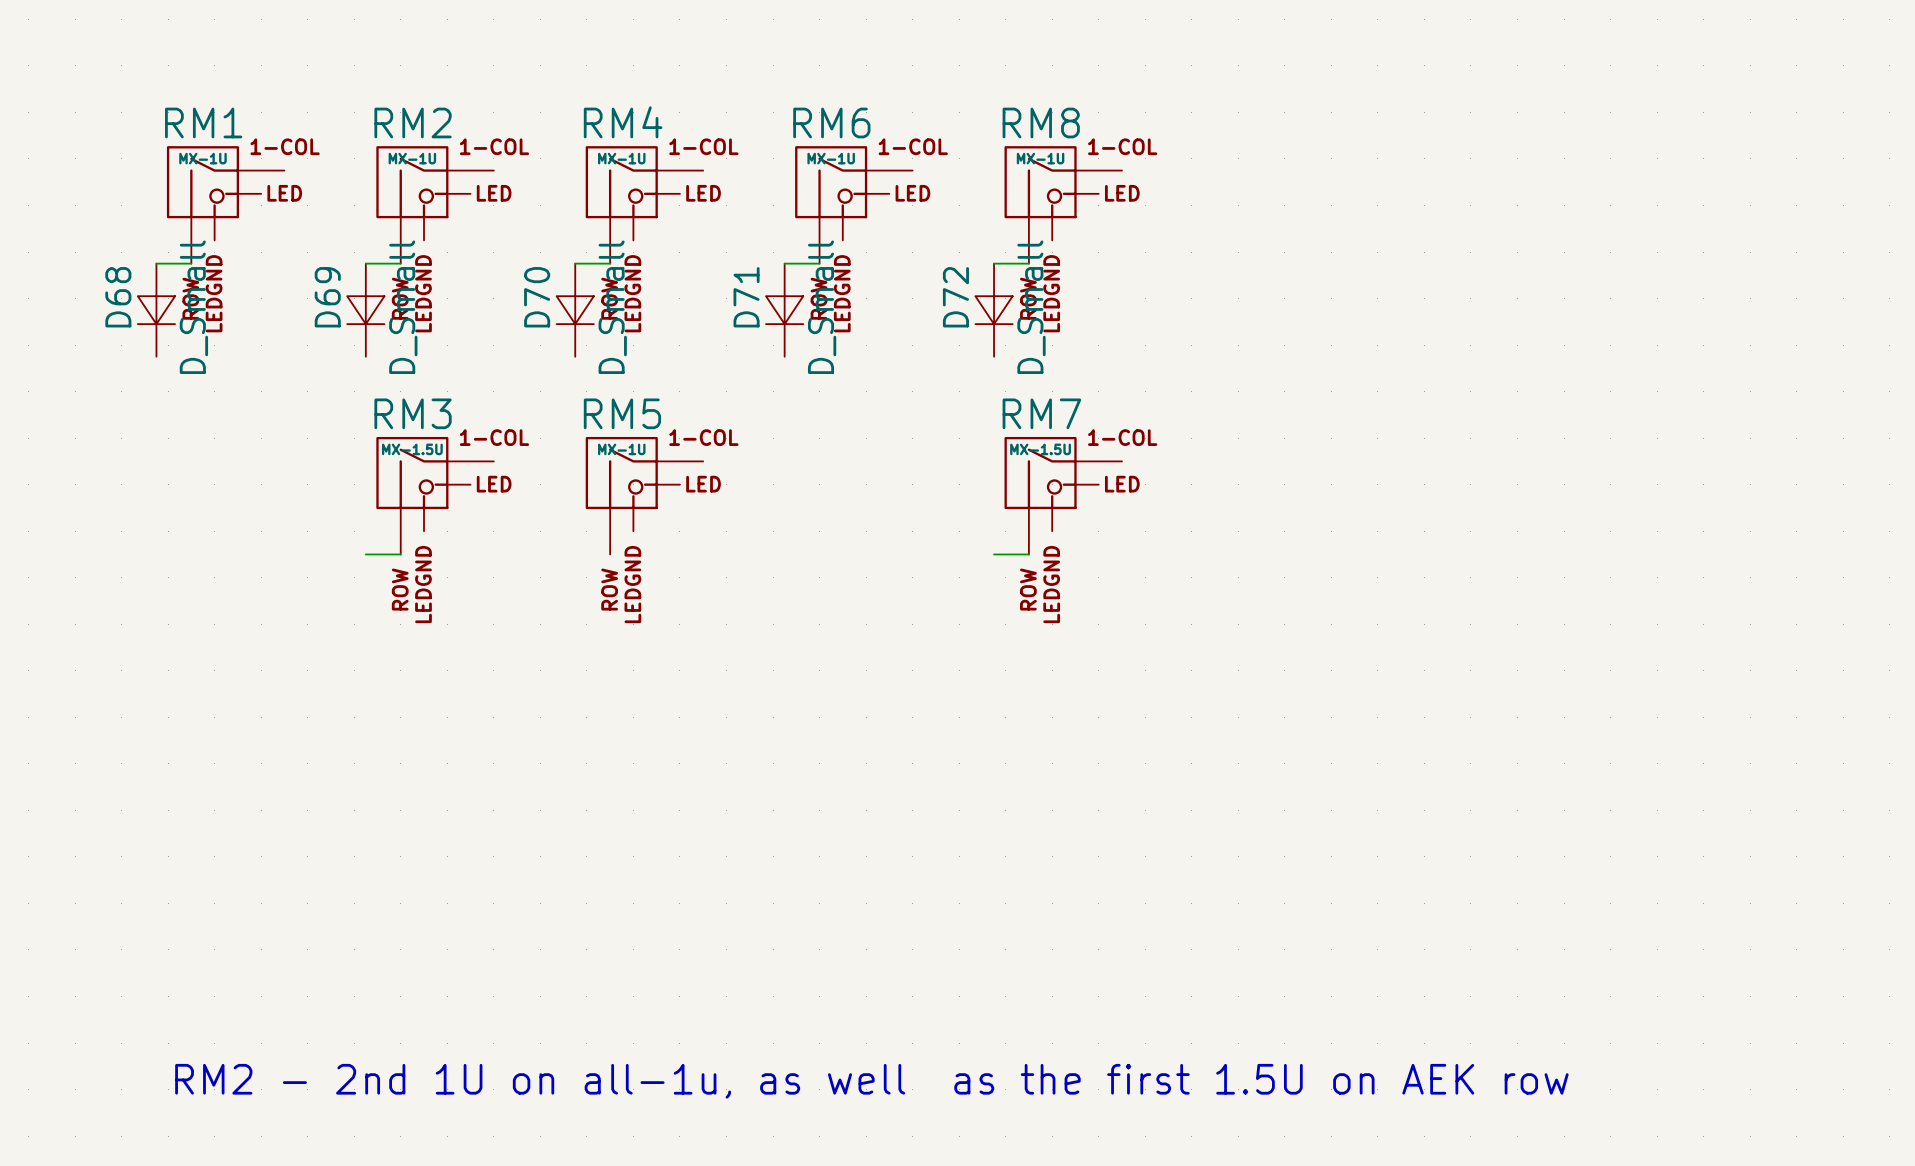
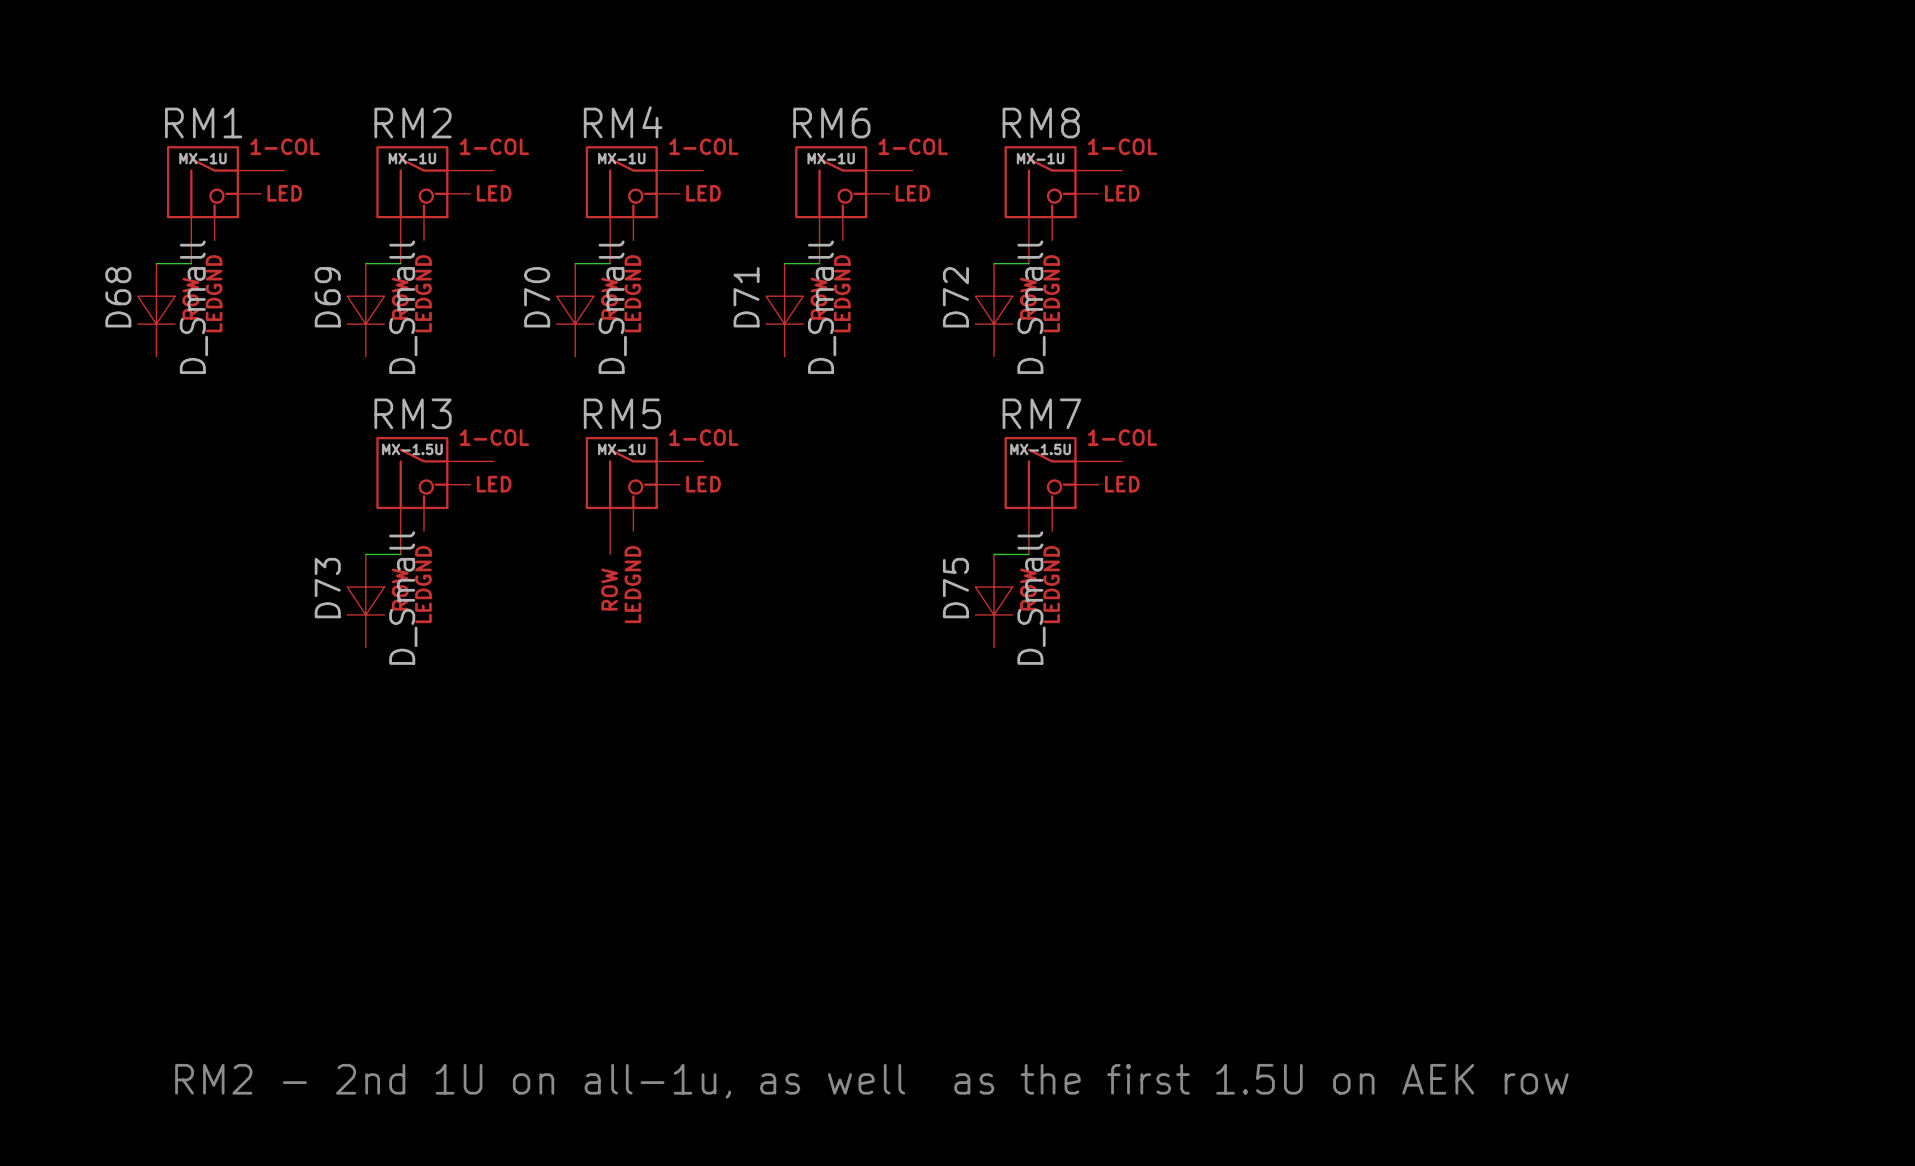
D73: none -> D_Small (365, 600)
D75: none -> D_Small (994, 600)

